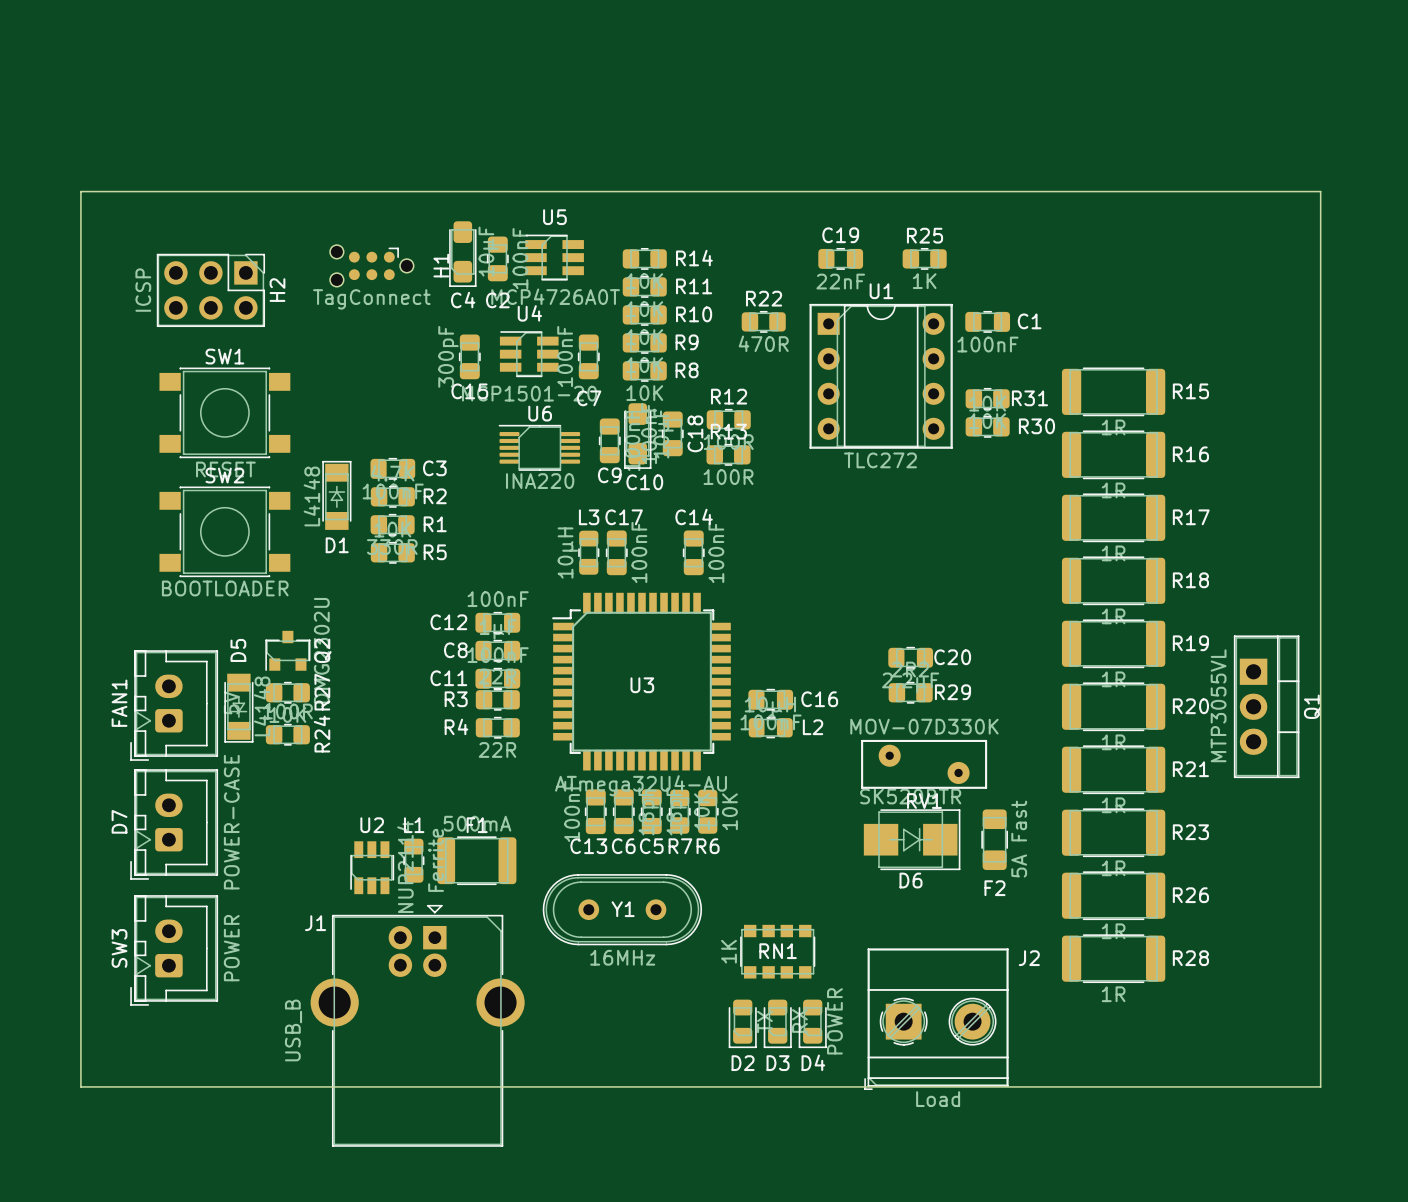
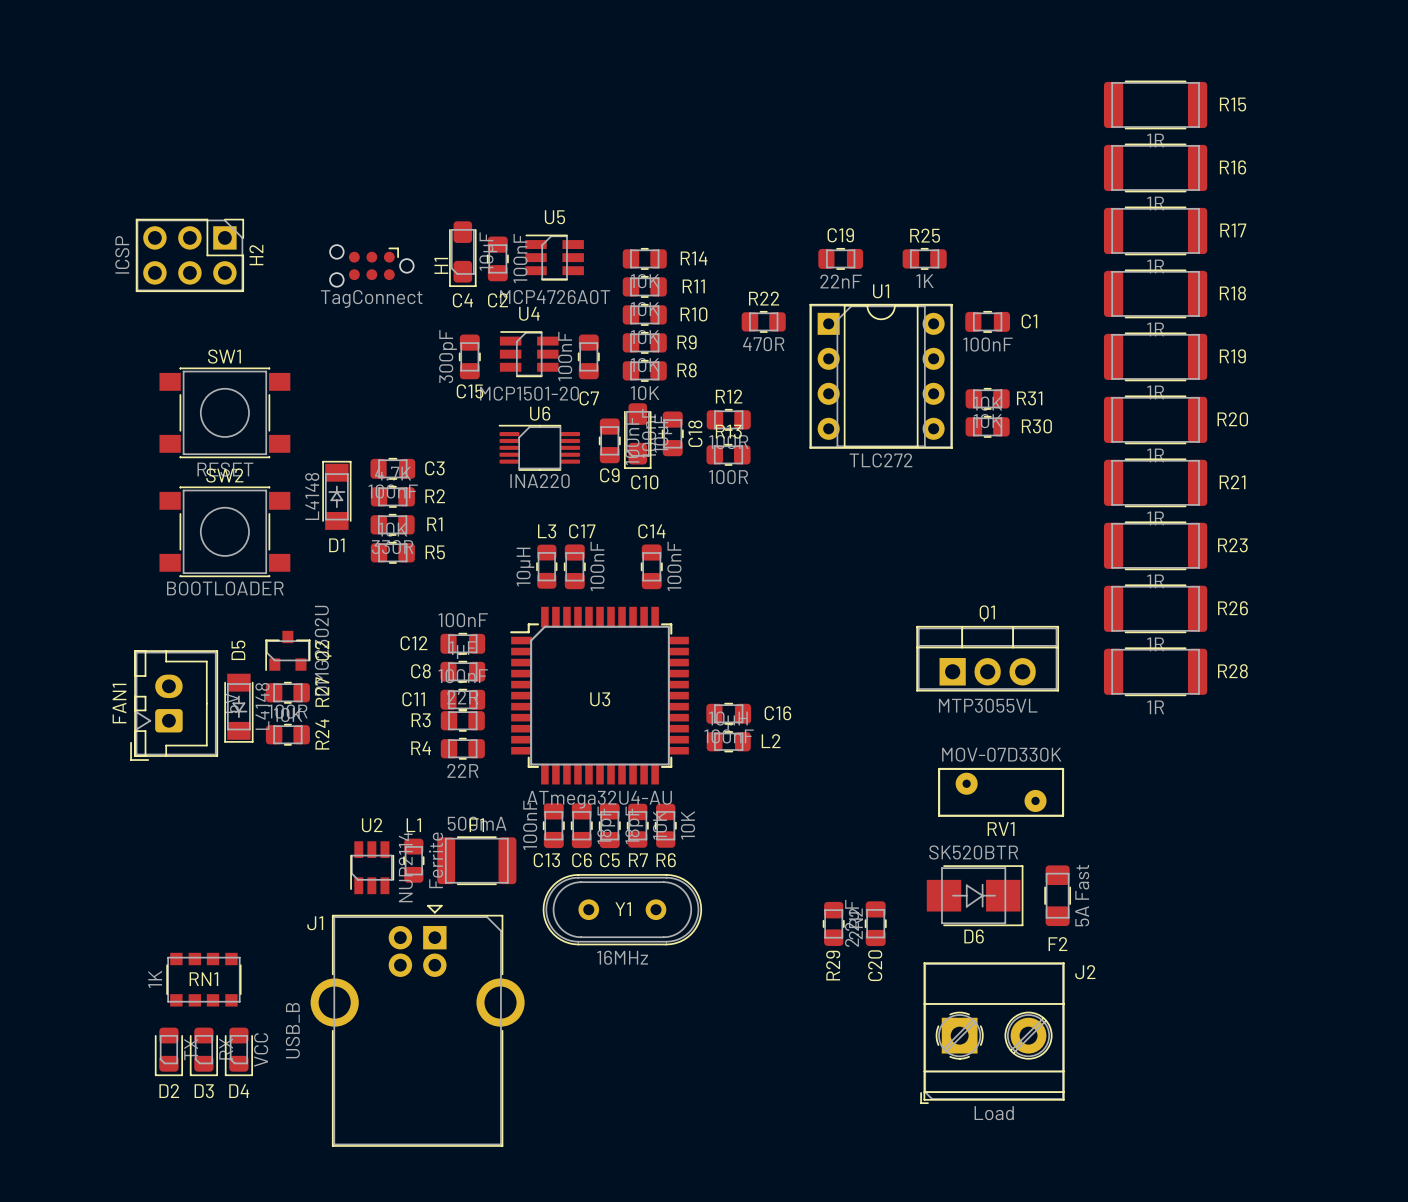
board edge: (80, 191) (80, 1086) (1320, 1086) (1320, 191) (80, 191) -> none
H2 position: (210, 290) -> (189, 255)
R15 position: (1113, 391) -> (1155, 104)
R16 position: (1113, 454) -> (1155, 167)
R17 position: (1113, 517) -> (1155, 230)
L3 position: (588, 552) -> (546, 566)
C17 position: (616, 552) -> (574, 566)
C14 position: (693, 552) -> (651, 566)
R18 position: (1113, 580) -> (1155, 293)
C12 position: (497, 622) -> (462, 643)
R19 position: (1113, 643) -> (1155, 356)
C8 position: (497, 650) -> (462, 671)
C20 rotation: 0° (910, 657) -> 90° clockwise (875, 923)
C20 position: (910, 657) -> (875, 923)
C11 position: (497, 678) -> (462, 699)
U3 position: (641, 681) -> (599, 695)
R29 rotation: 0° (910, 692) -> 90° clockwise (833, 923)
R29 position: (910, 692) -> (833, 923)
R3 position: (497, 699) -> (462, 720)
C16 position: (770, 699) -> (728, 713)
R20 position: (1113, 706) -> (1155, 419)
Q1 rotation: 0° (1266, 706) -> 90° counterclockwise (987, 658)
Q1 position: (1266, 706) -> (987, 658)
R4 position: (497, 727) -> (462, 748)
L2 position: (770, 727) -> (728, 741)
RV1 position: (924, 764) -> (1001, 792)
R21 position: (1113, 769) -> (1155, 482)
C13 position: (595, 811) -> (553, 825)
C6 position: (623, 811) -> (581, 825)
C5 position: (651, 811) -> (609, 825)
R7 position: (679, 811) -> (637, 825)
R6 position: (707, 811) -> (665, 825)
D7: POWER-CASE (174, 824) -> none
R23 position: (1113, 832) -> (1155, 545)
D6 position: (912, 839) -> (975, 895)
F2 position: (994, 839) -> (1057, 895)
R26 position: (1113, 895) -> (1155, 608)
SW3: POWER (174, 950) -> none
RN1 position: (777, 951) -> (203, 979)
R28 position: (1113, 958) -> (1155, 671)
J2 position: (936, 1019) -> (992, 1033)
D4 value: POWER (834, 1021) -> VCC (261, 1049)
D2 position: (742, 1023) -> (168, 1051)
D3 position: (777, 1023) -> (203, 1051)
D4 position: (812, 1023) -> (238, 1051)

